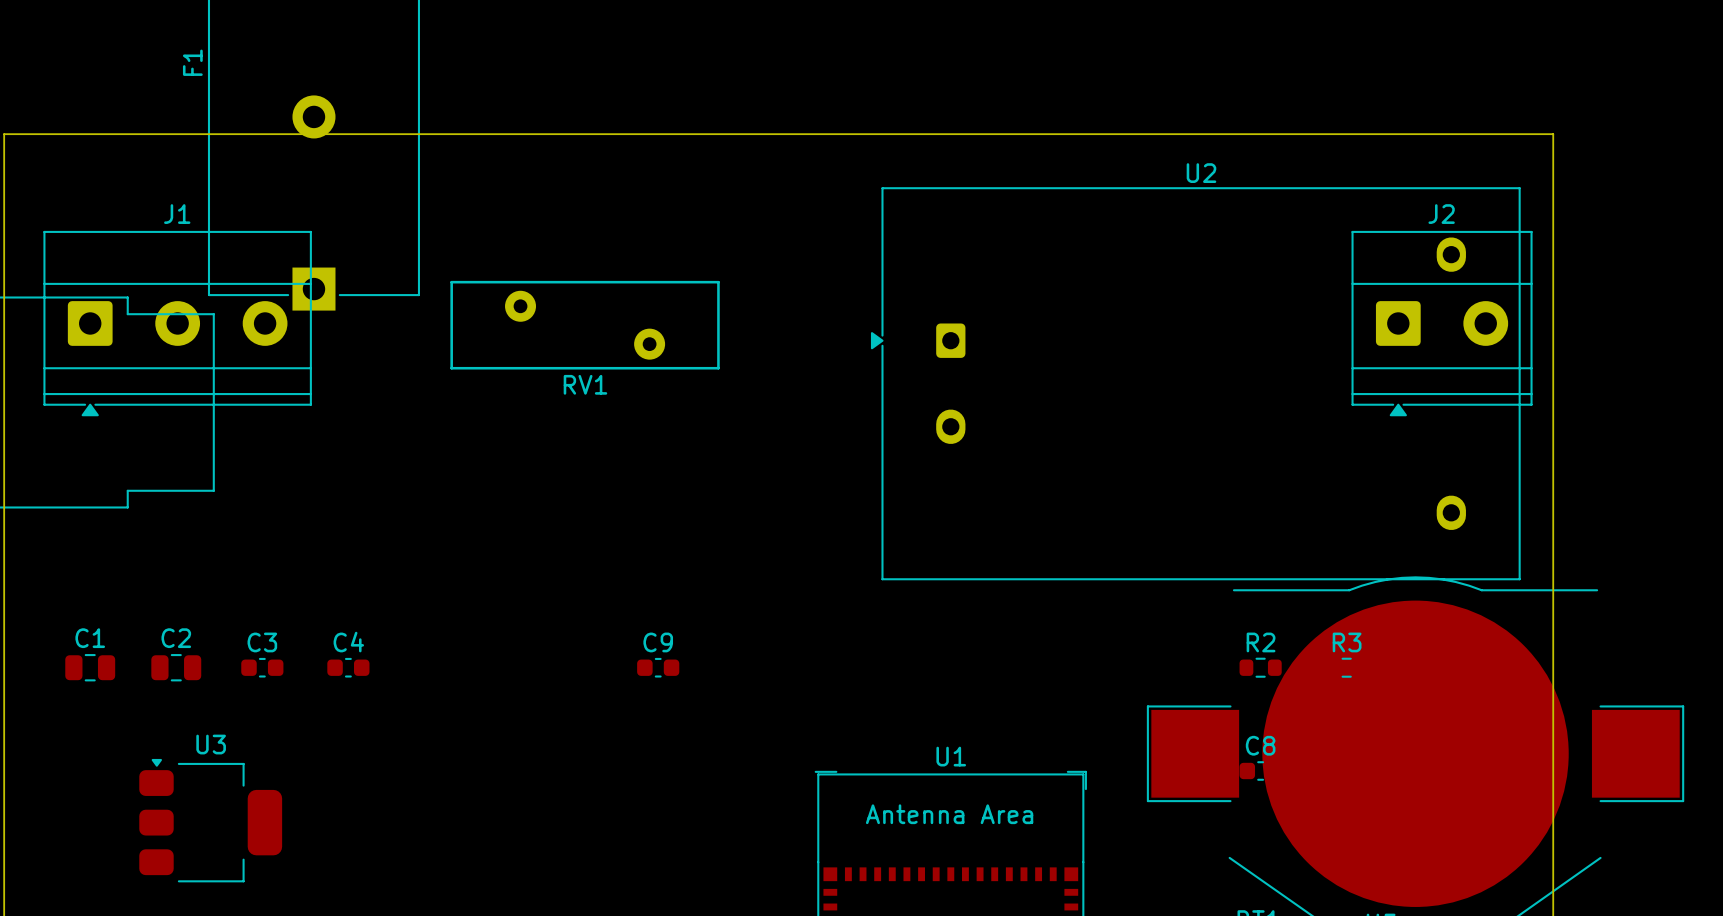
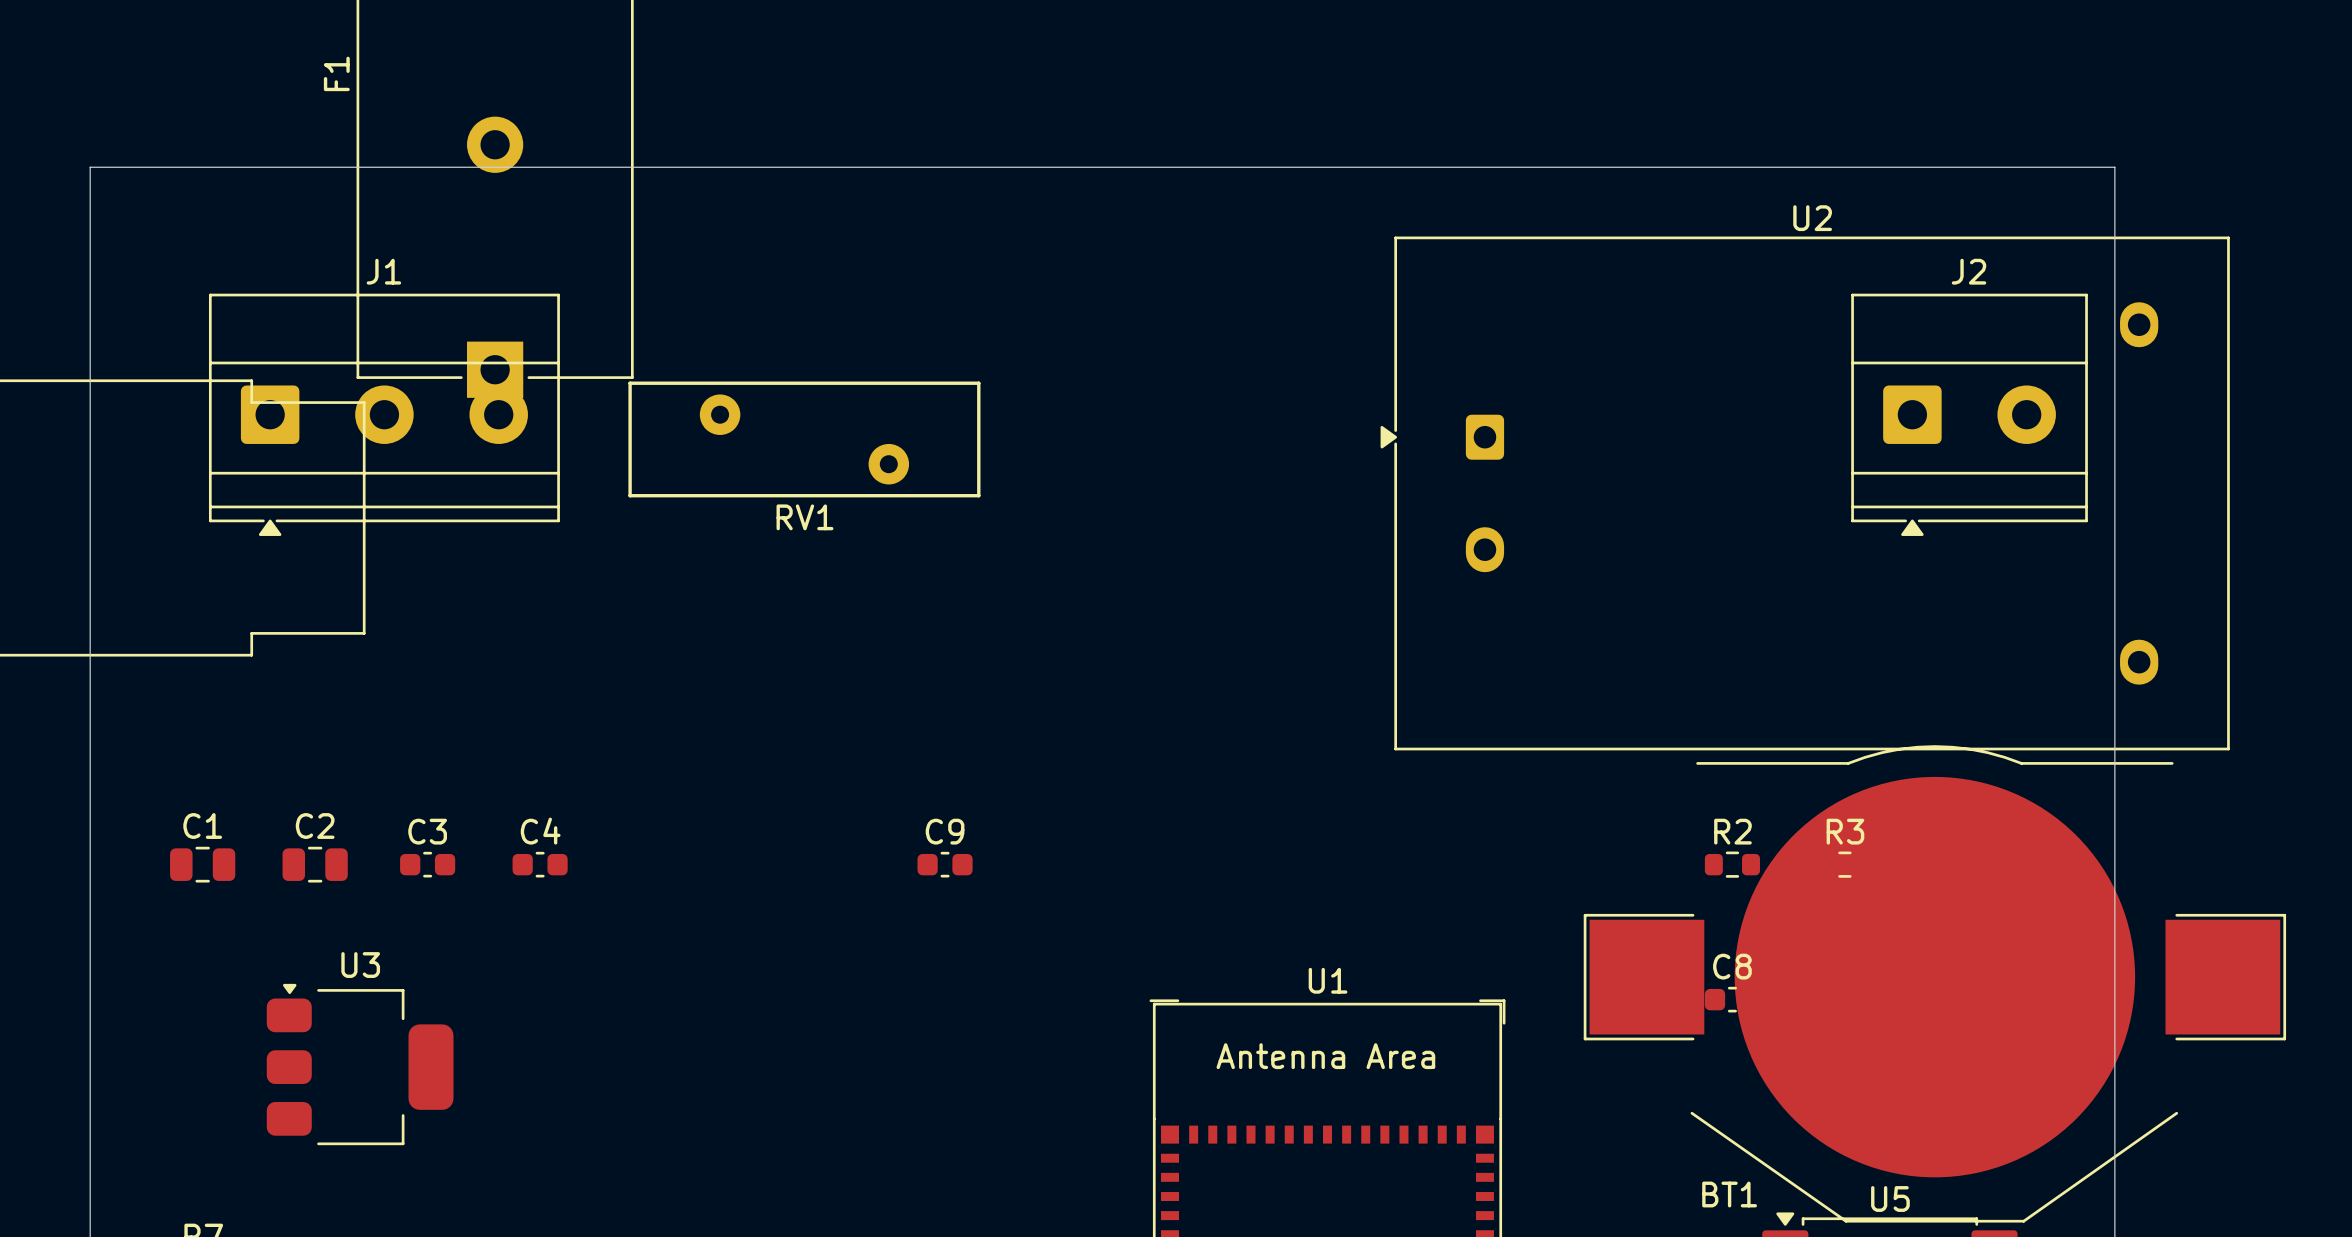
J1 position: (177, 323) -> (384, 414)
RV1 position: (585, 325) -> (804, 439)
U2 position: (1195, 383) -> (1805, 493)

